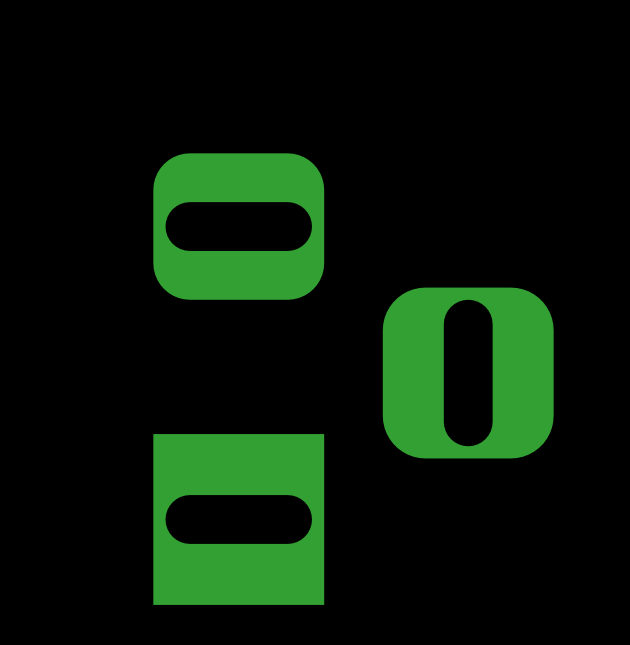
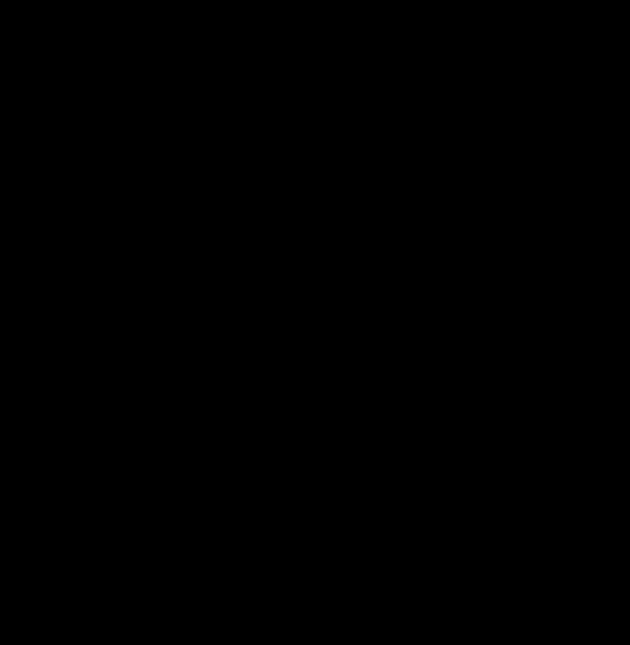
part: (353, 379) -> none

